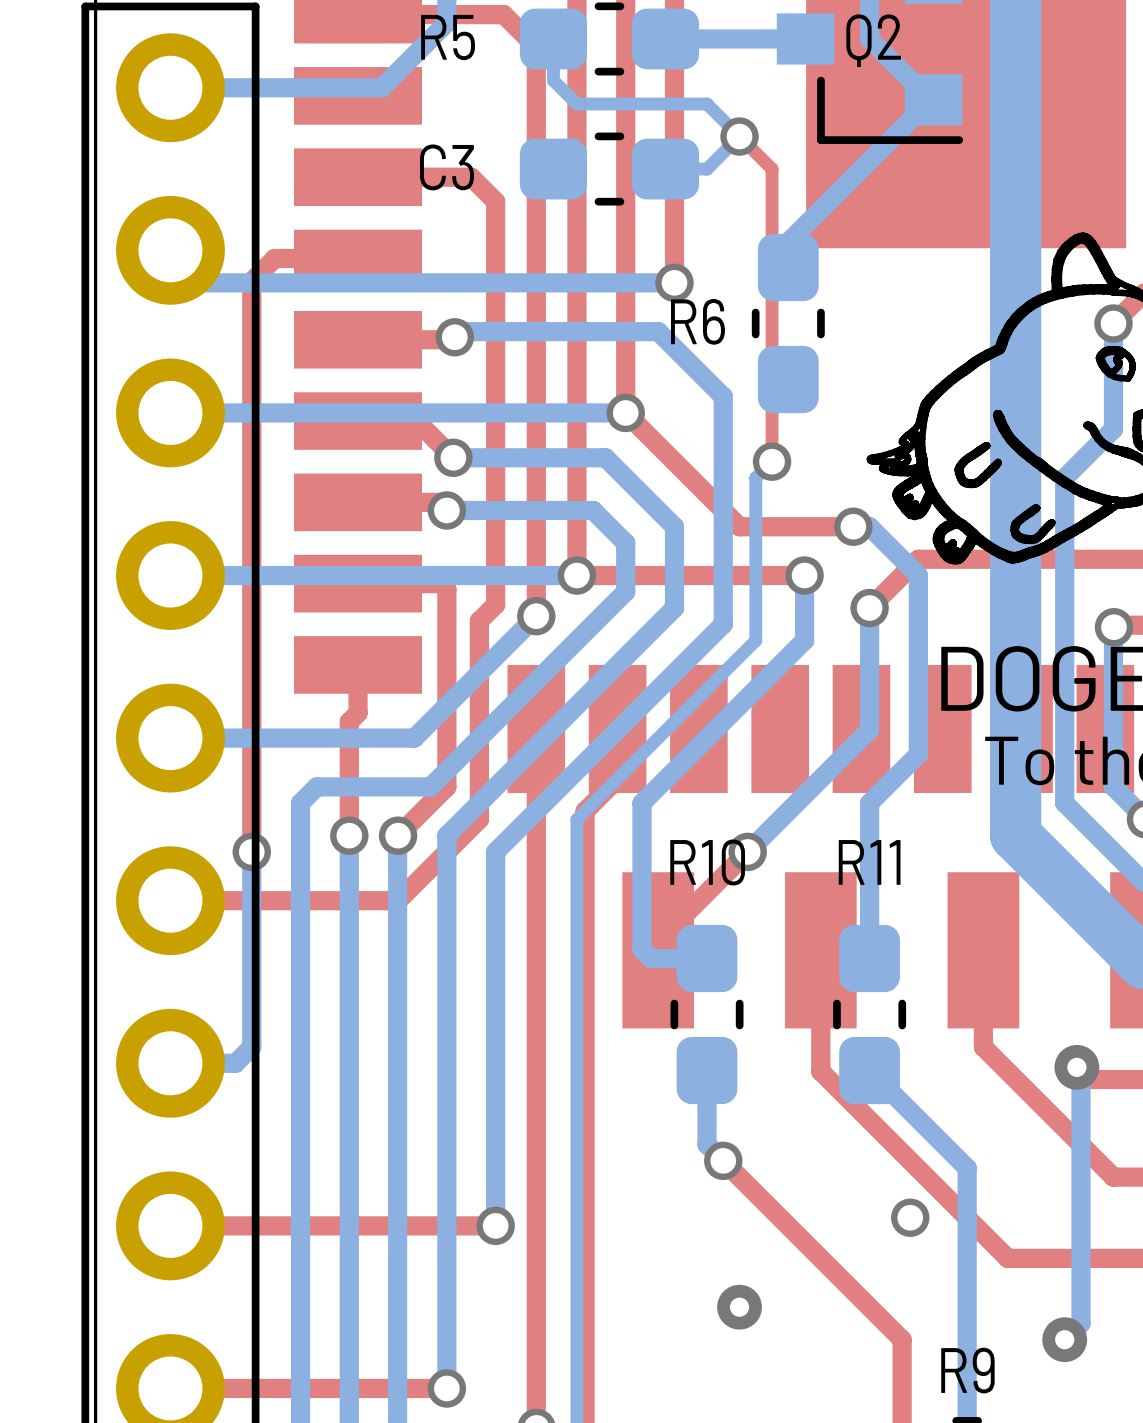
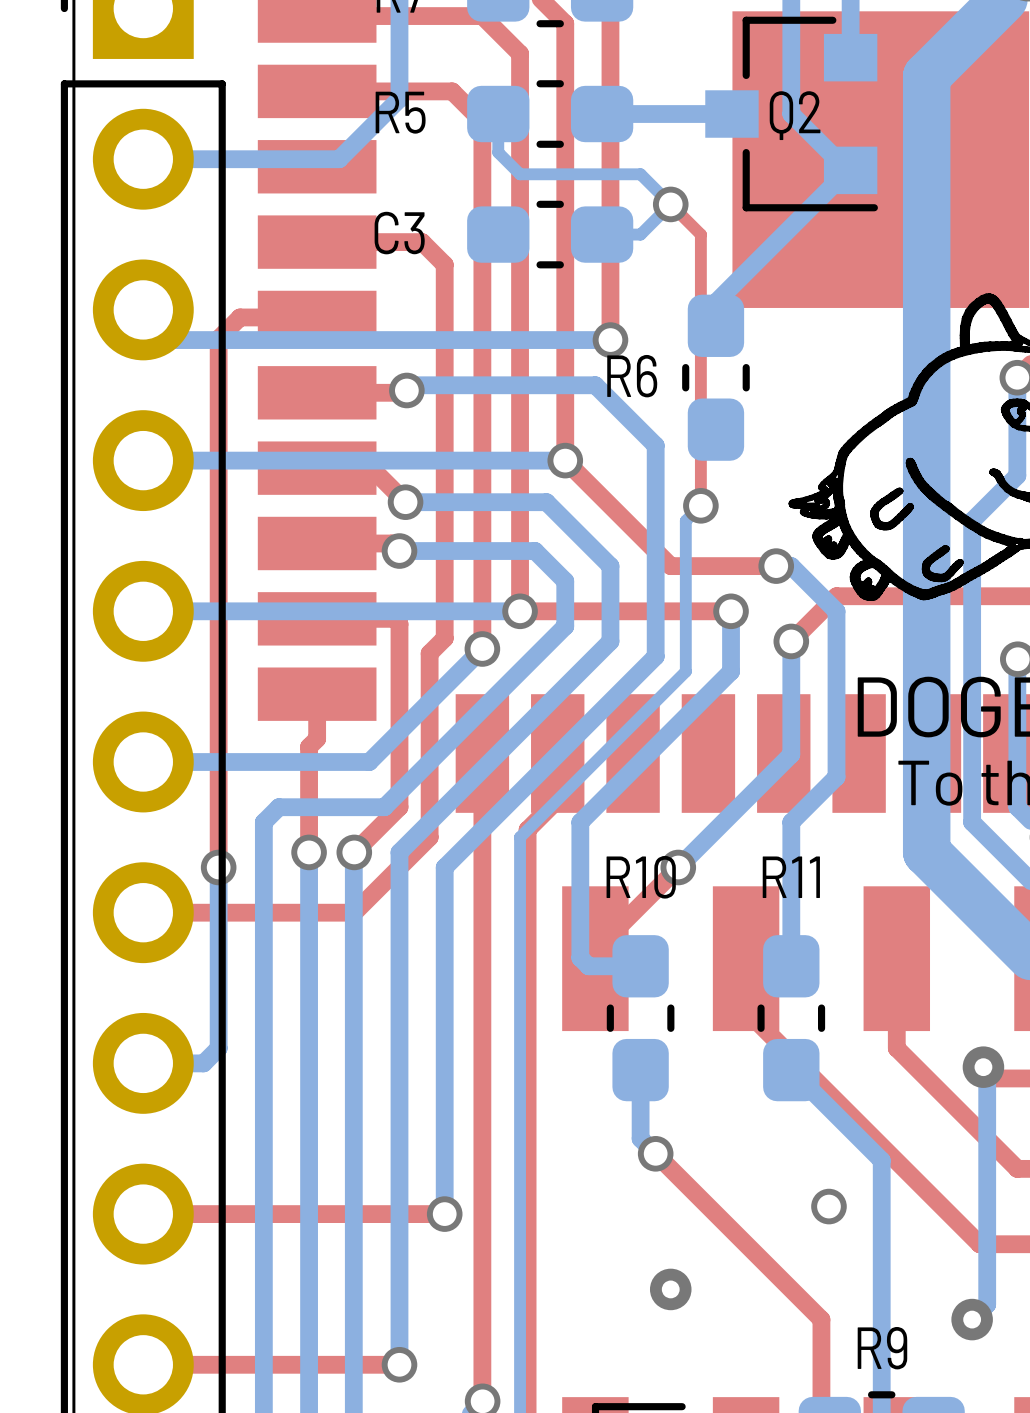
top track: (820, 1006) (820, 1071) (1007, 1258) (1072, 1258) -> (746, 1010) (979, 1244)

